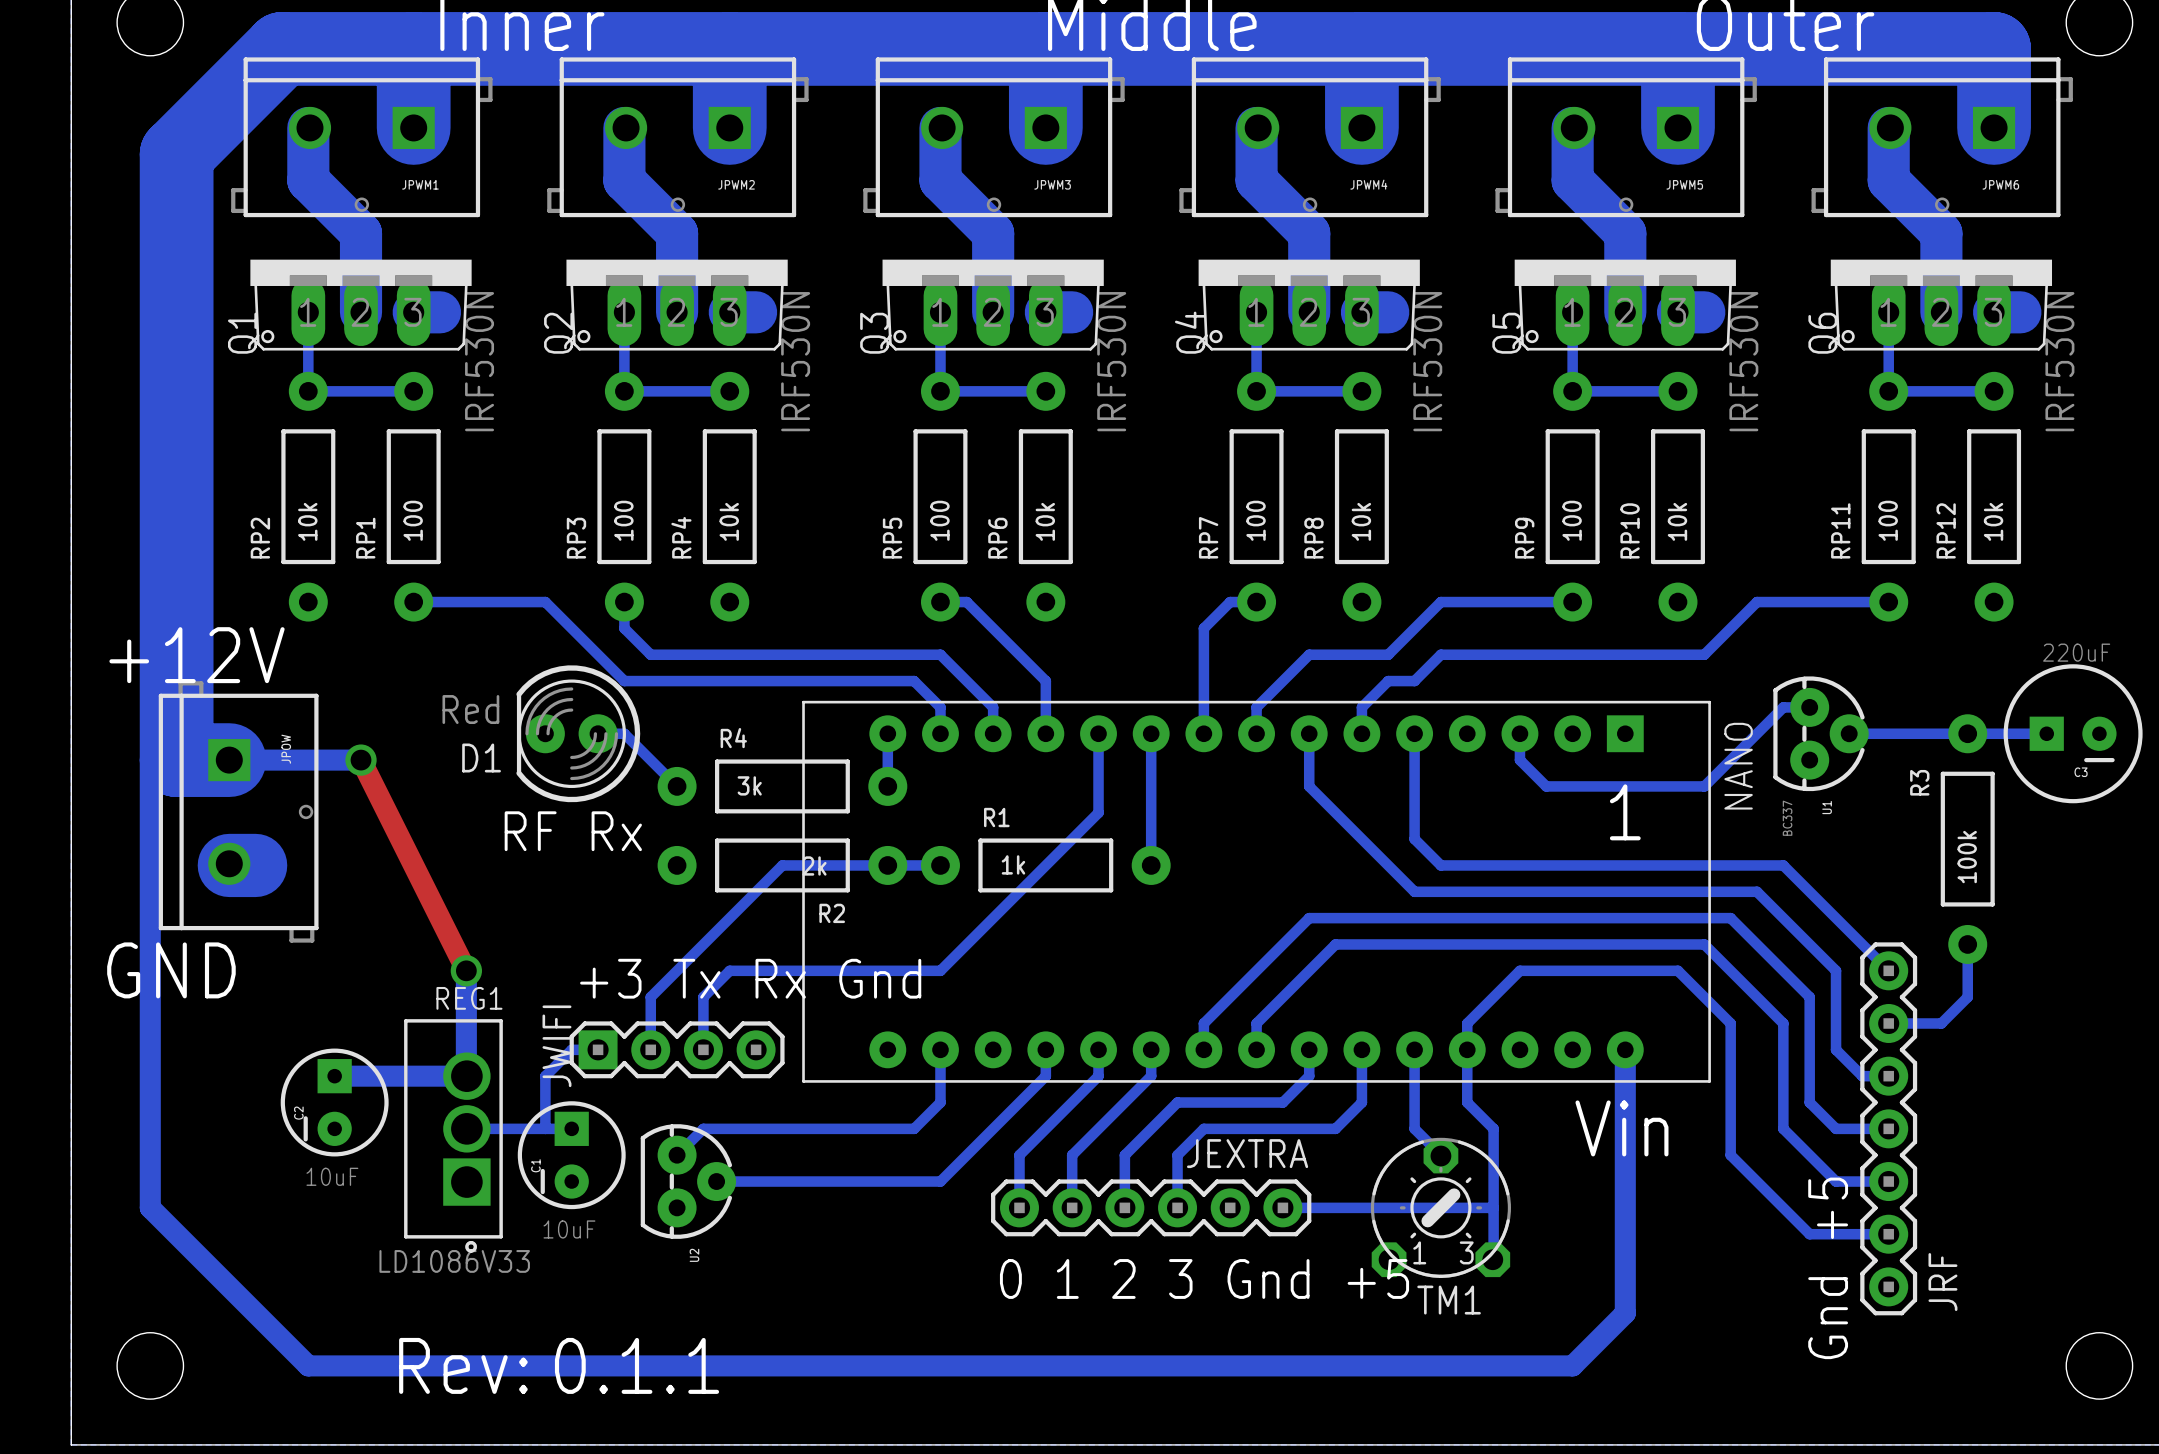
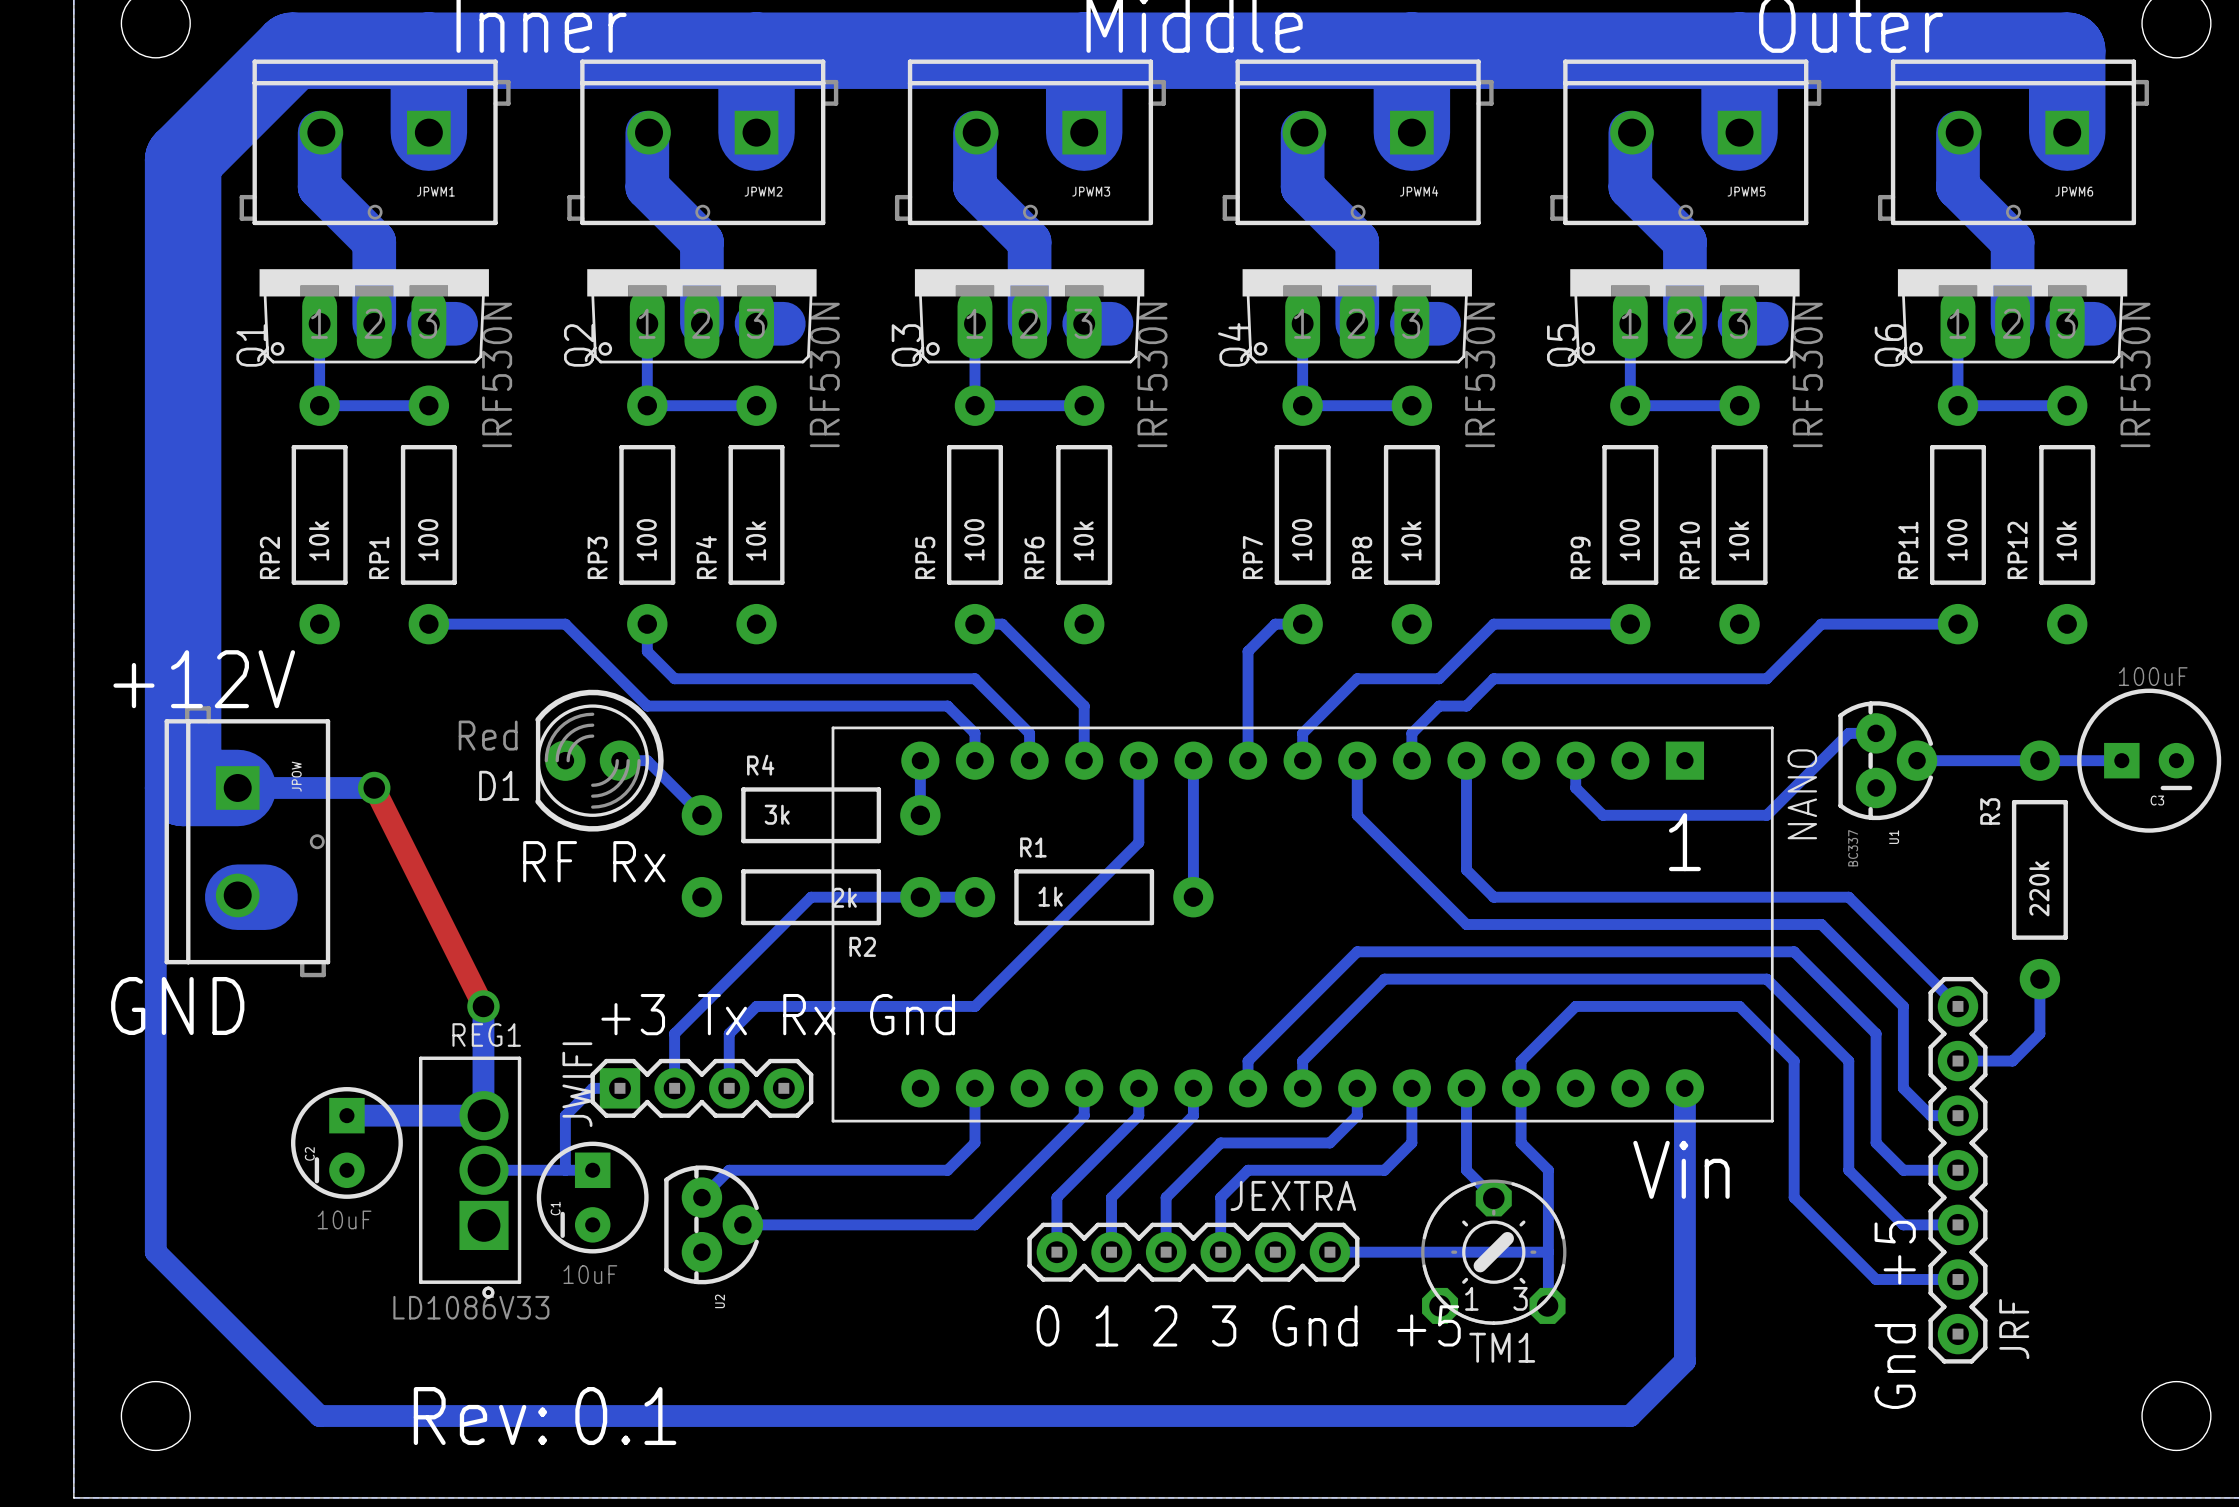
C3 value: 220uF (2076, 652) -> 100uF (2153, 676)
R3 value: 100k (1967, 857) -> 220k (2039, 888)
text: 0.1.1 (637, 1365) -> 0.1 (625, 1416)

